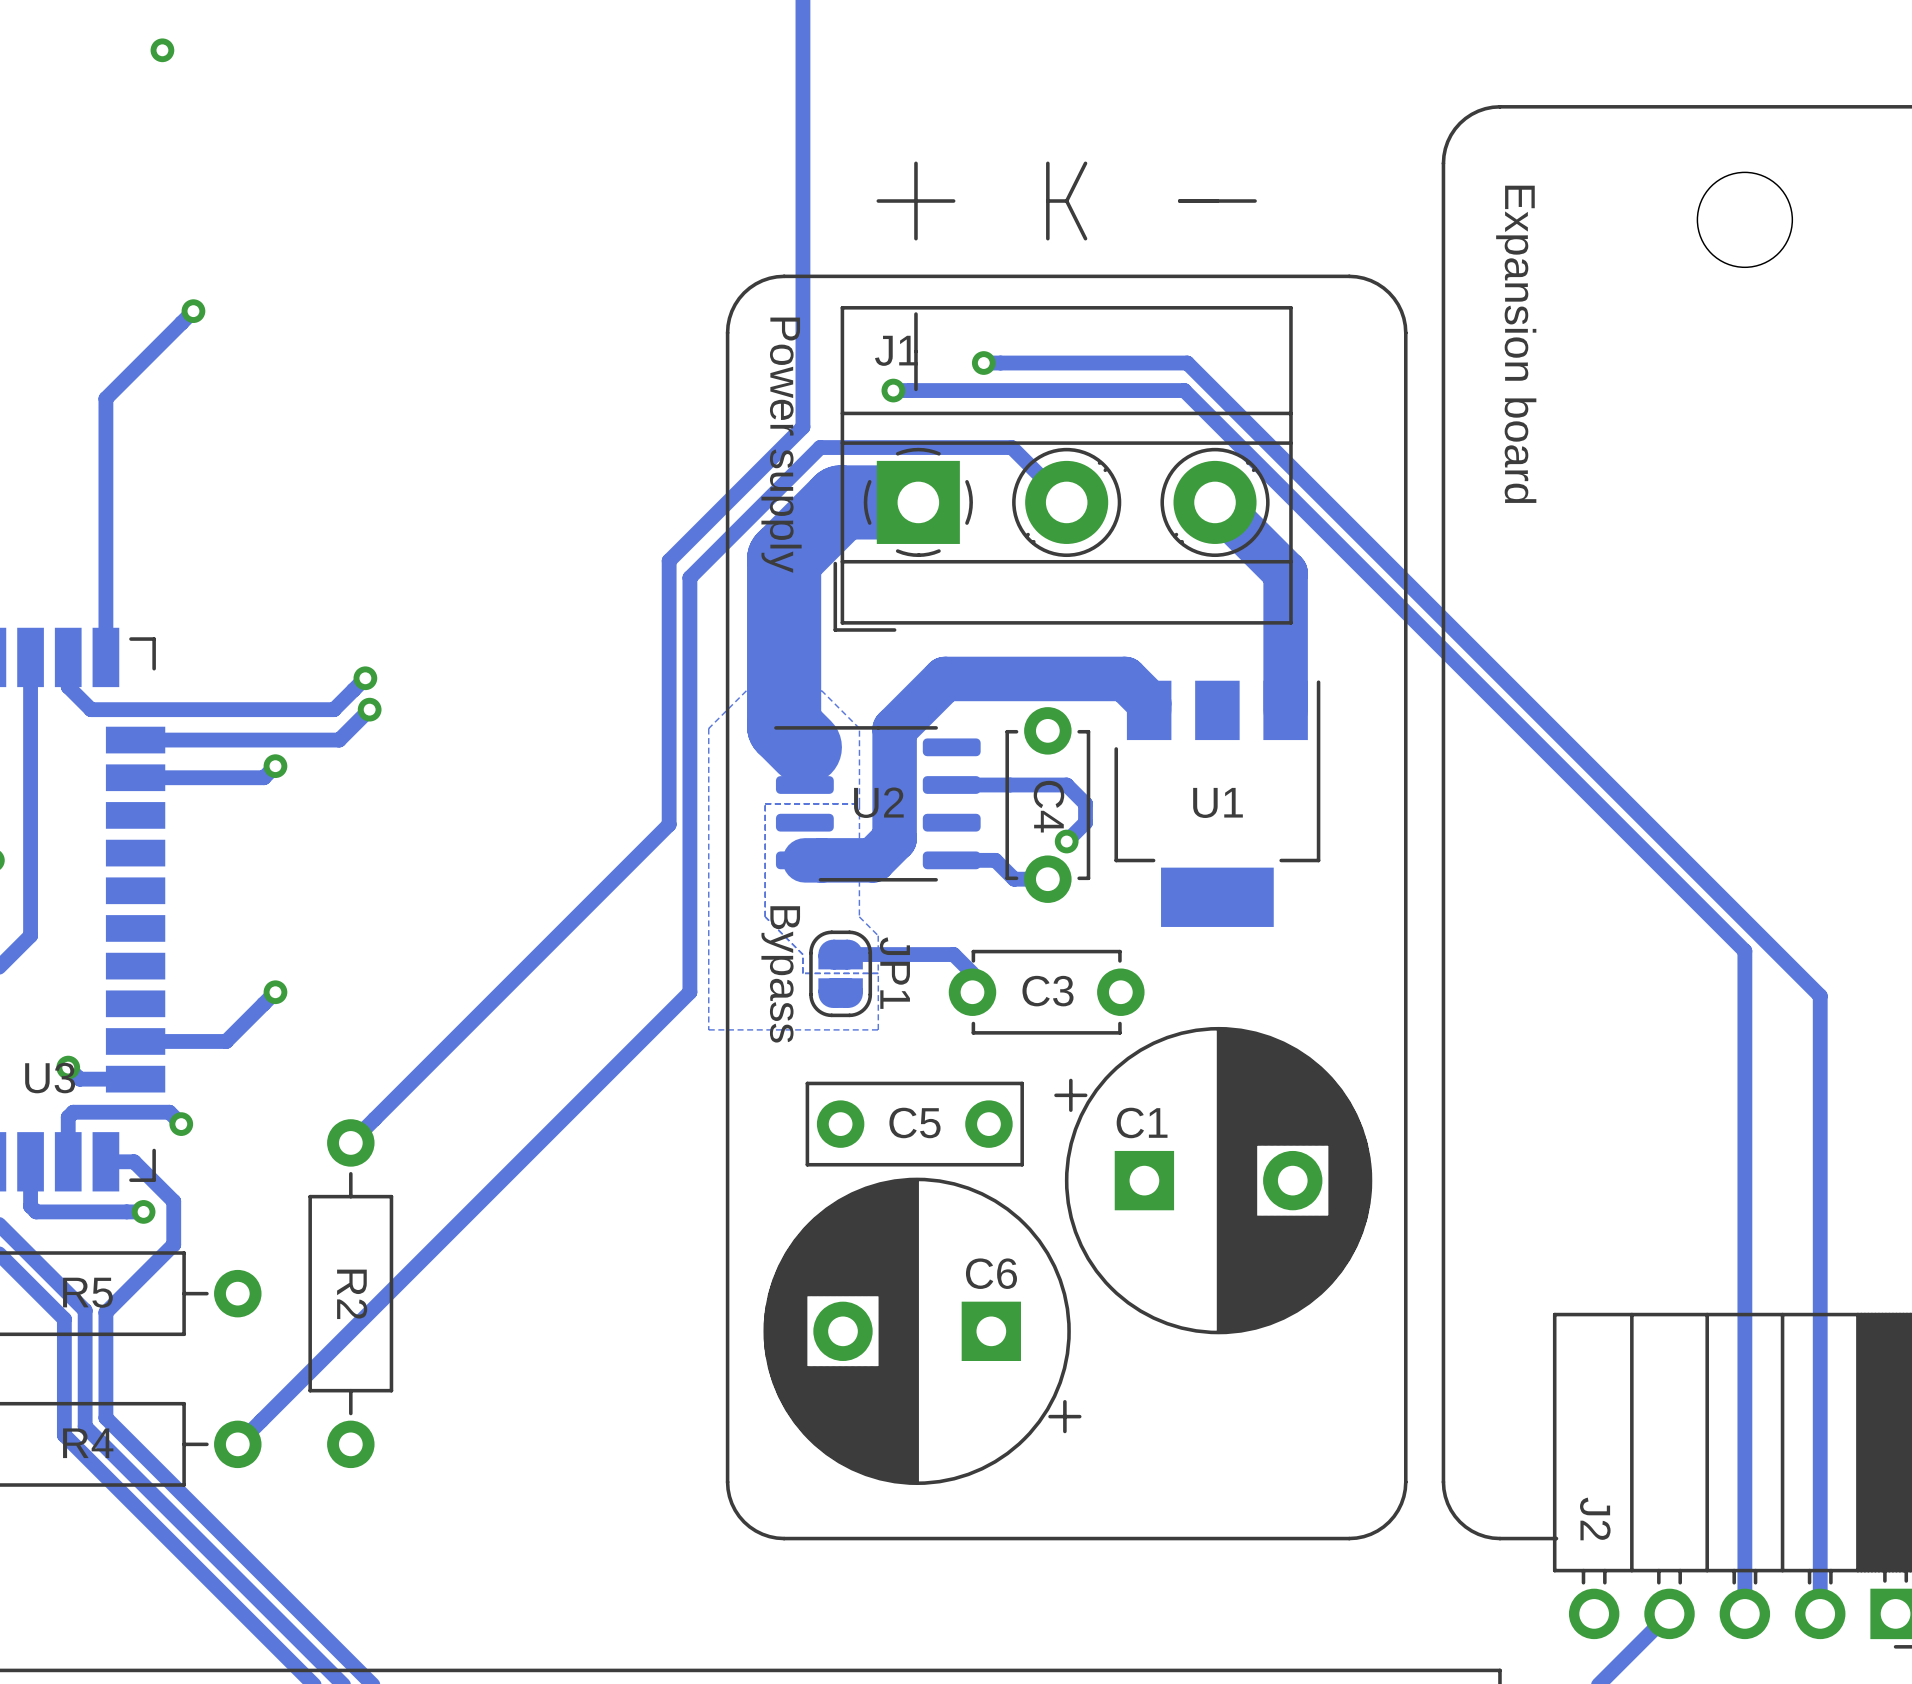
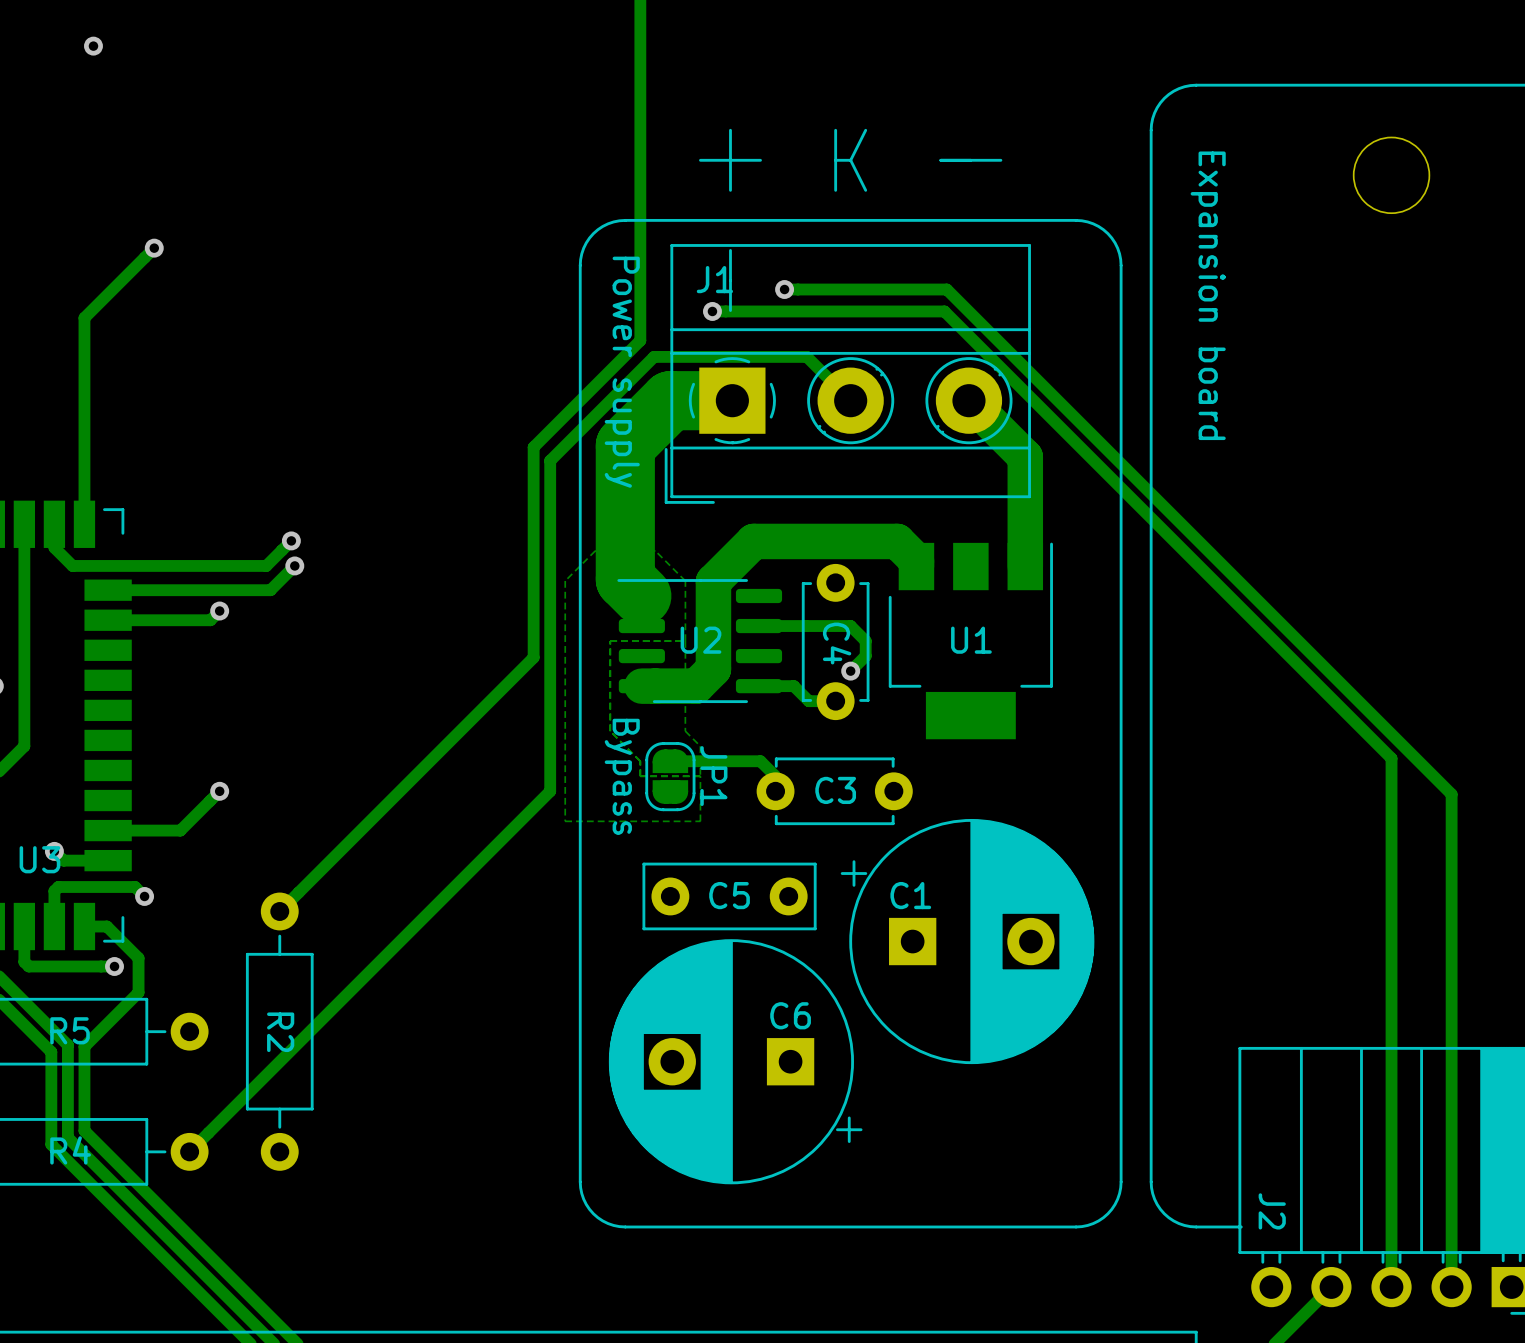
via position: (162, 50) -> (93, 46)

